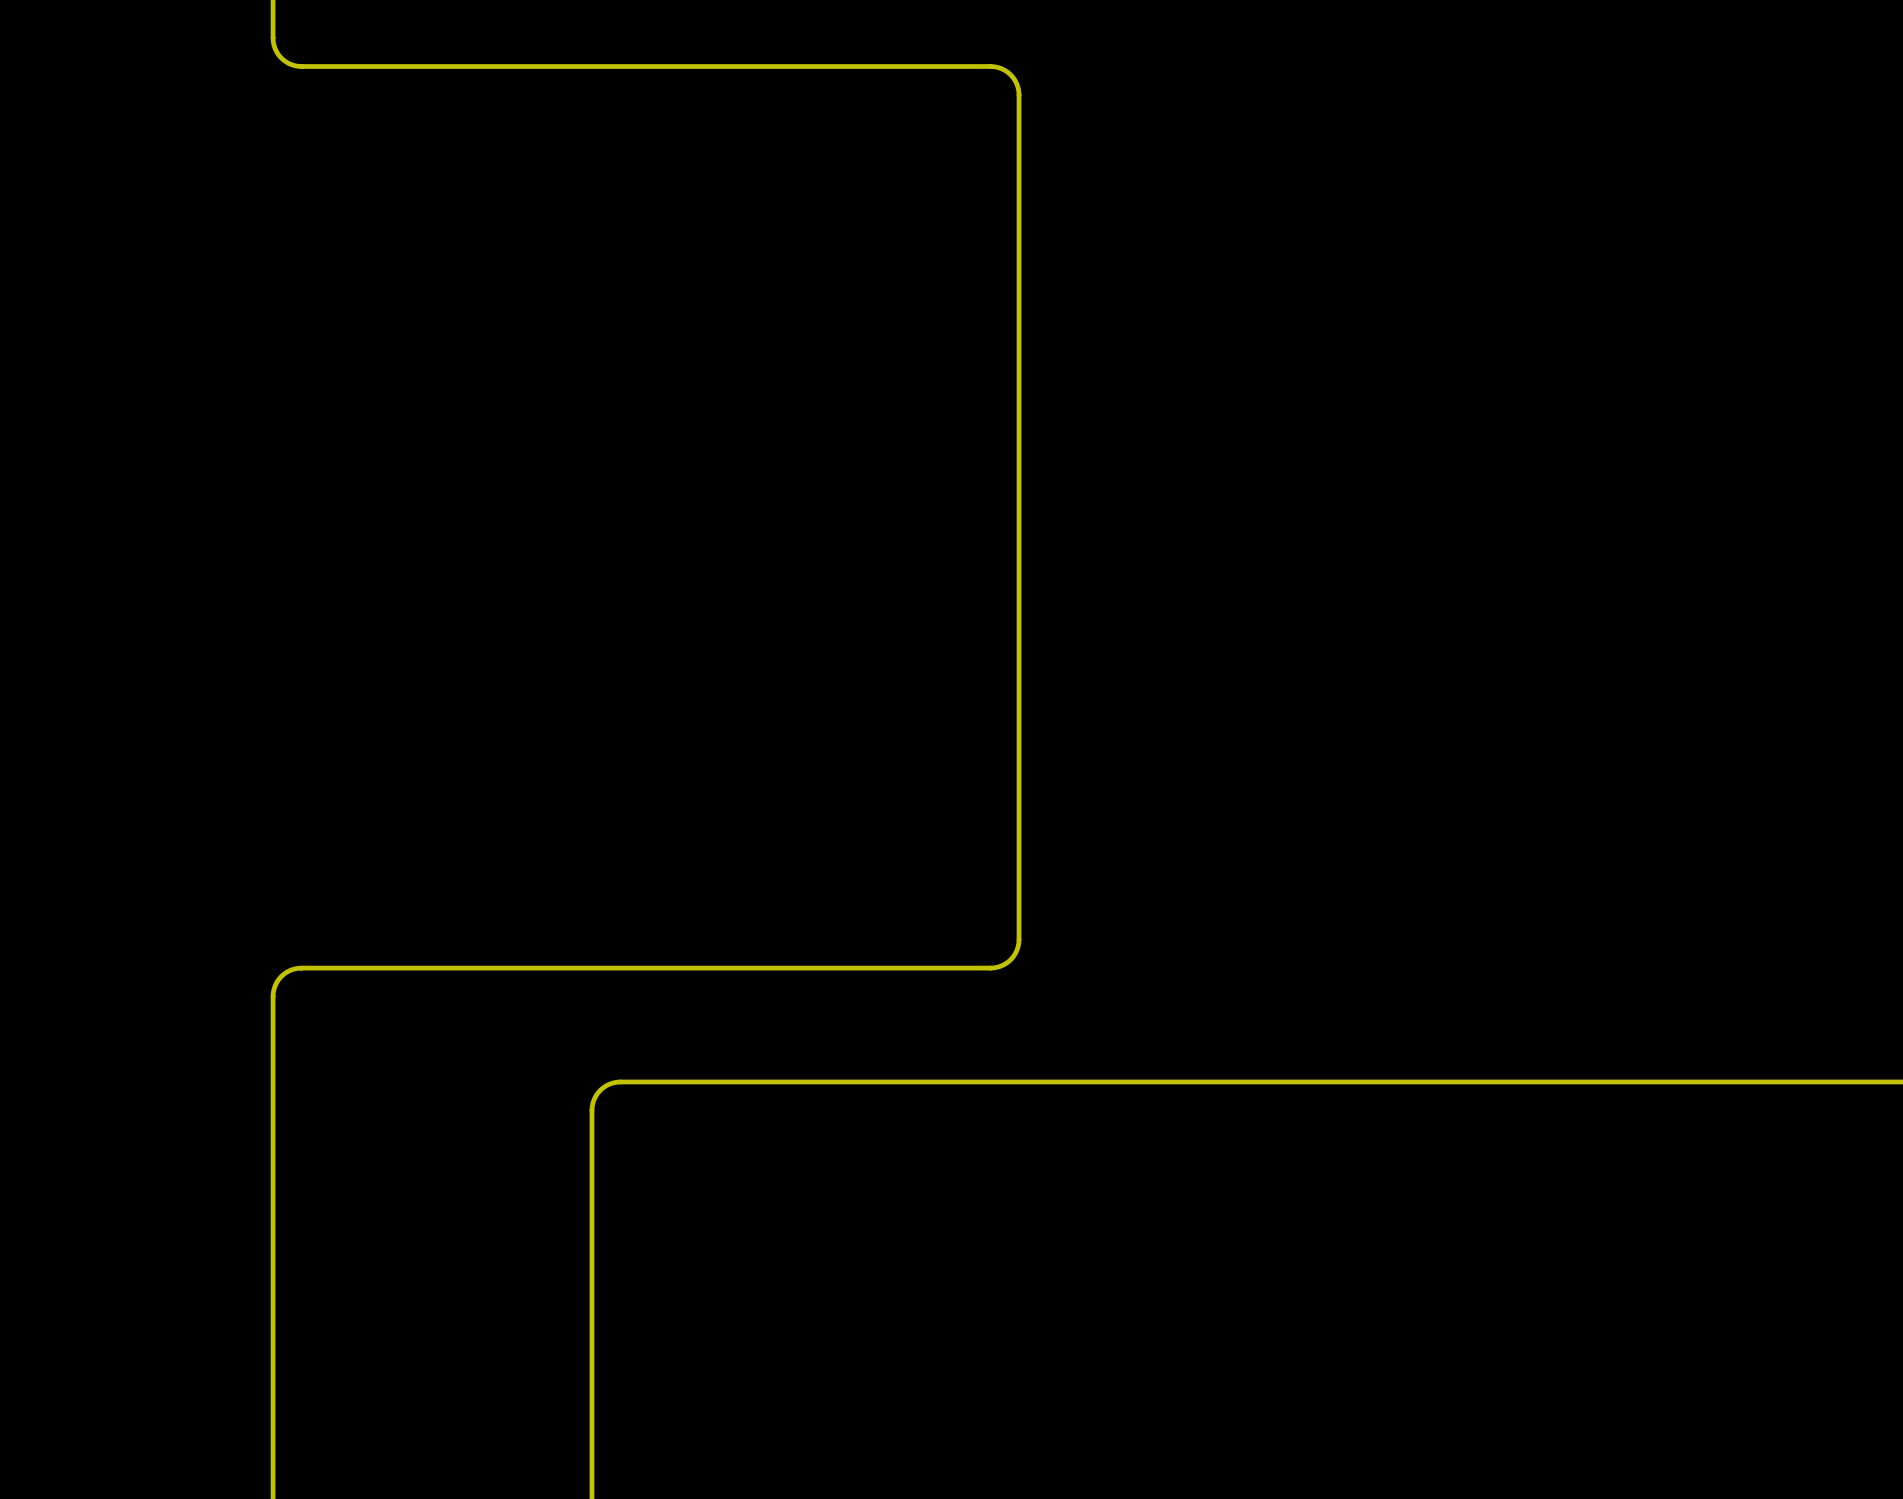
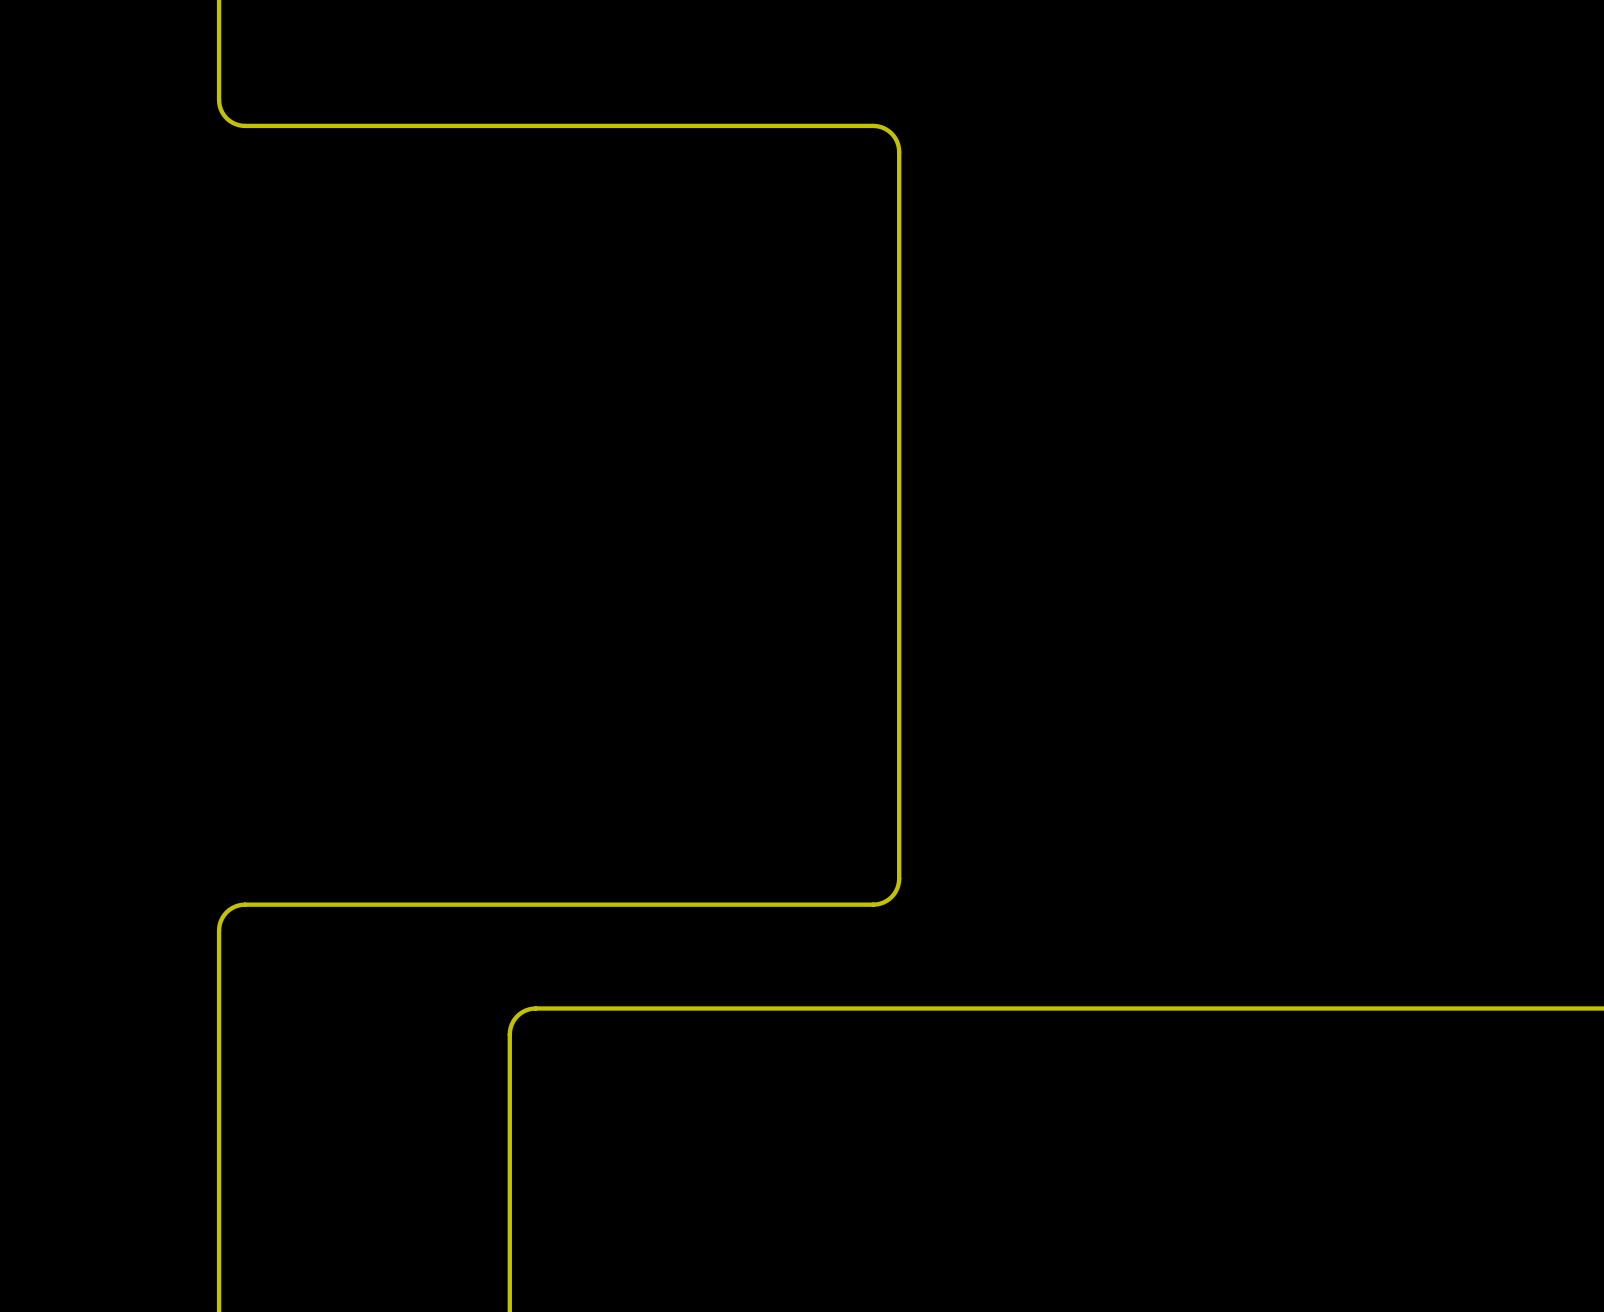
board edge: (273, 38) (275, 48) (281, 58) (290, 64) (301, 66) (994, 66) (1007, 72) (1018, 87) (1019, 142) -> (219, 56) (219, 106) (229, 120) (241, 125) (873, 125) (883, 127) (891, 133) (897, 141) (899, 151)

